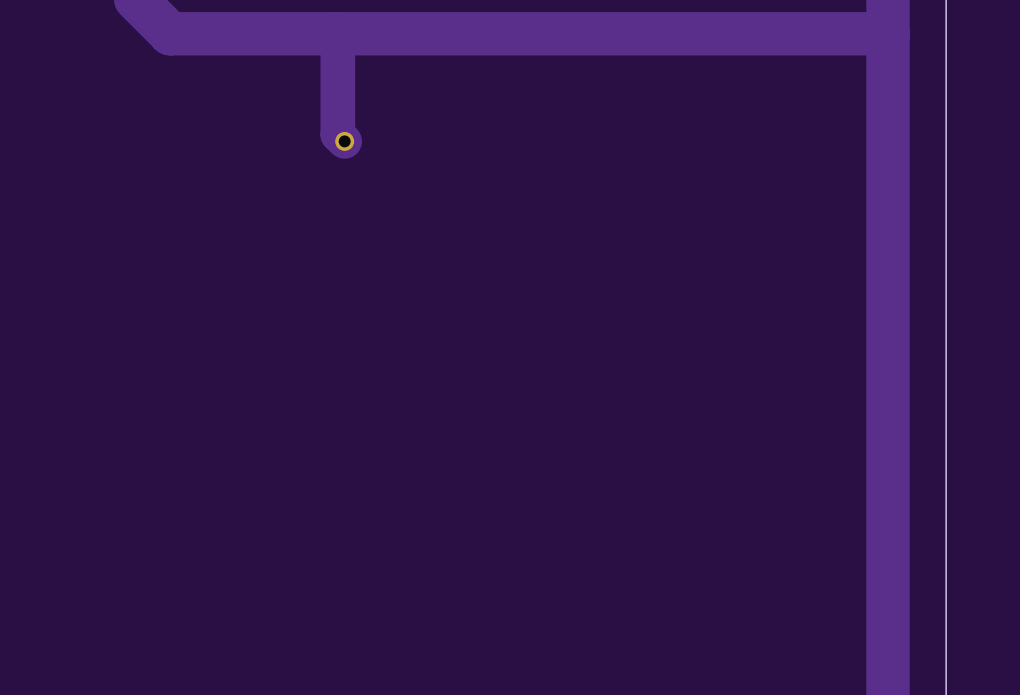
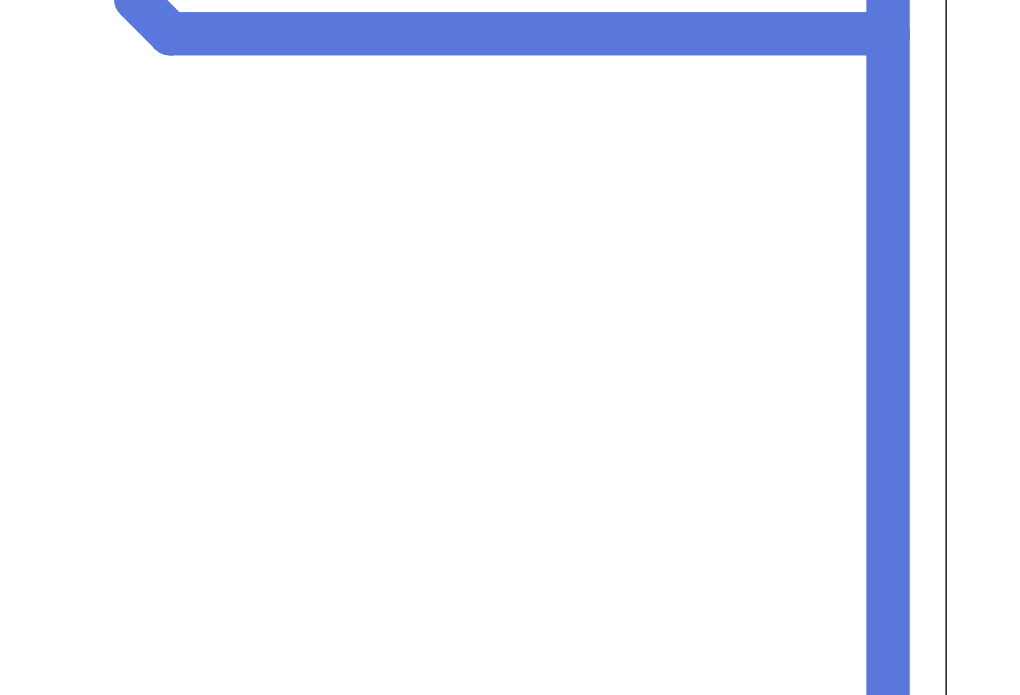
track: (337, 33) (337, 134) (344, 141) -> none
via: (344, 141) -> none

